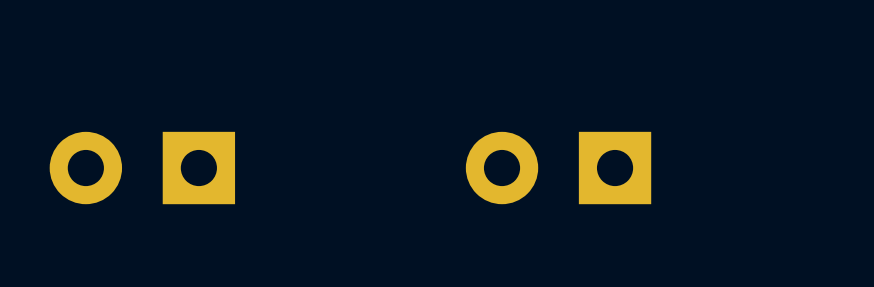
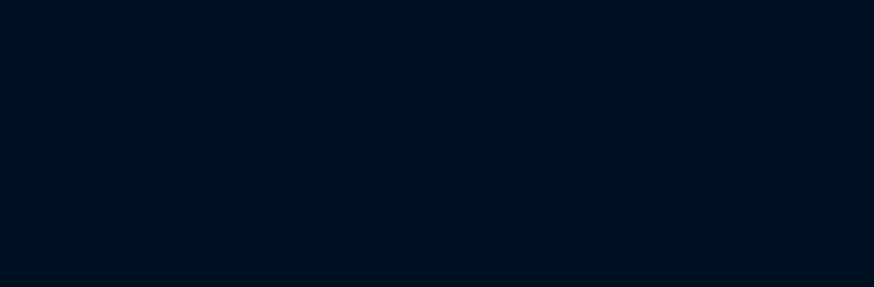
part: (142, 168) -> none
part: (558, 168) -> none

